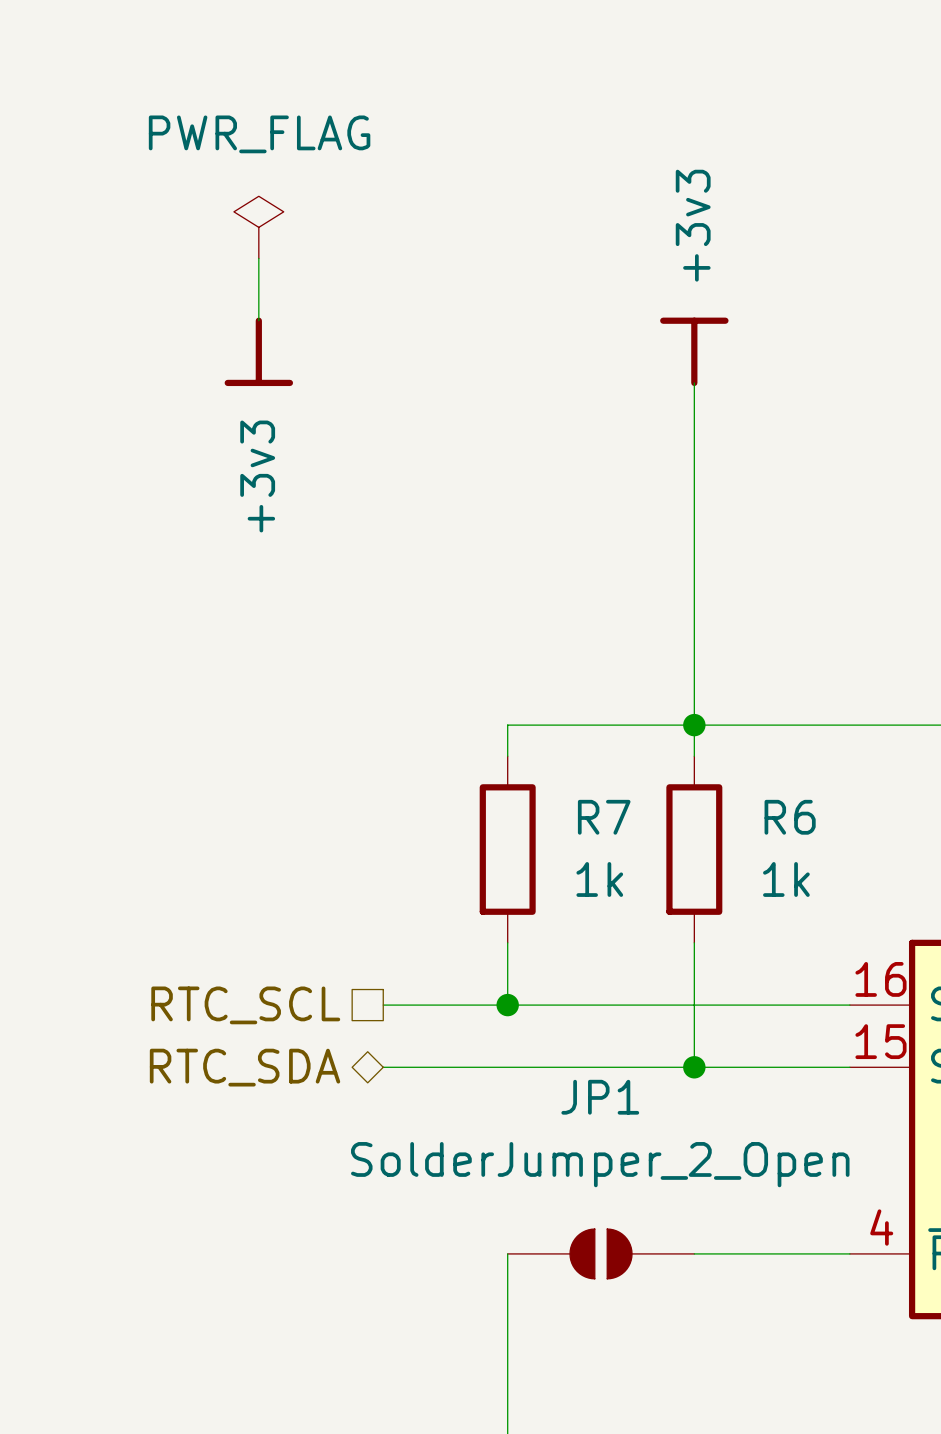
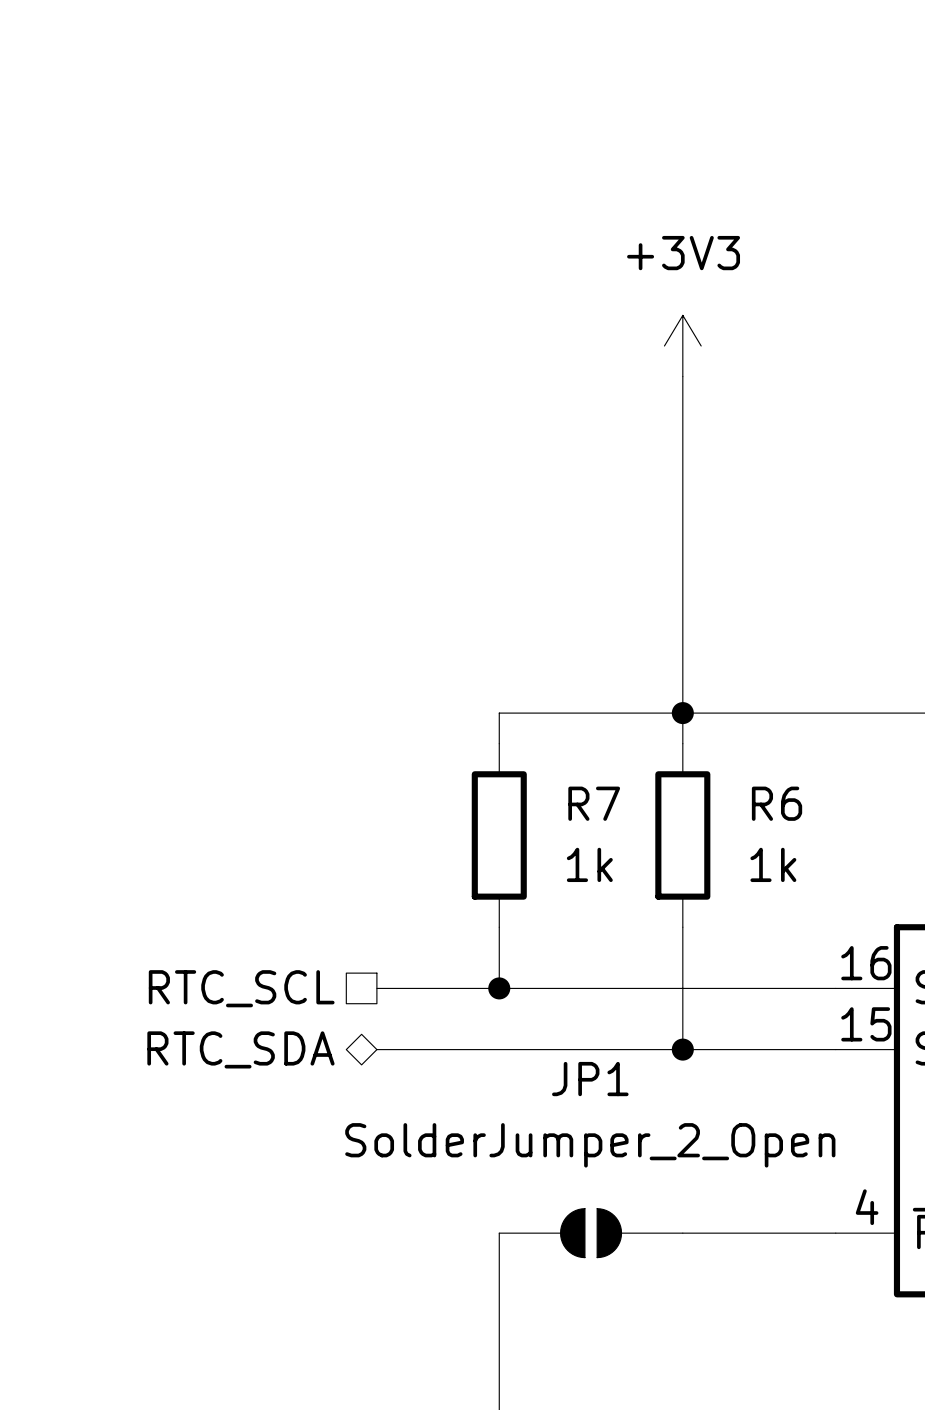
power symbol: PWR_FLAG (258, 227) -> none
wire: (258, 258) (258, 320) -> none
power symbol: +3v3 (258, 351) -> none
power symbol: +3v3 (694, 351) -> +3V3 (682, 345)

